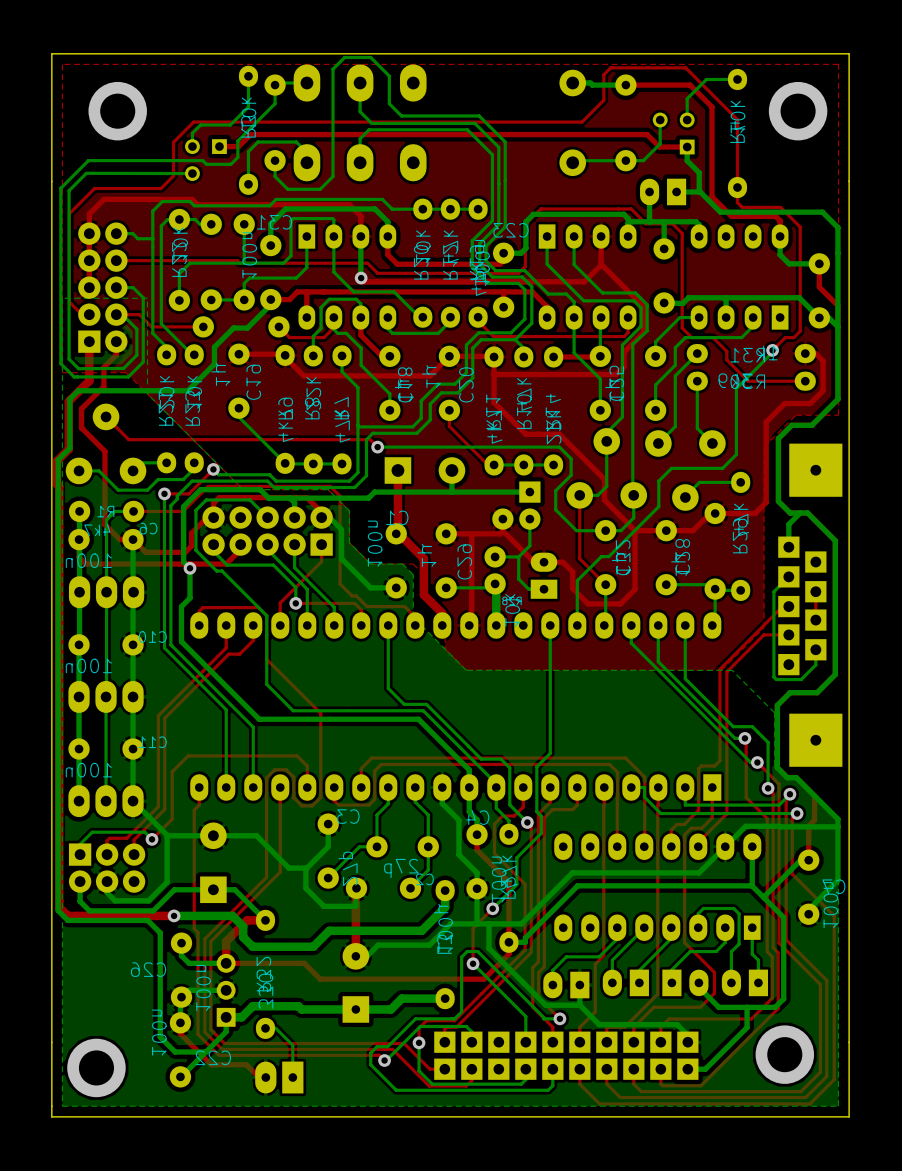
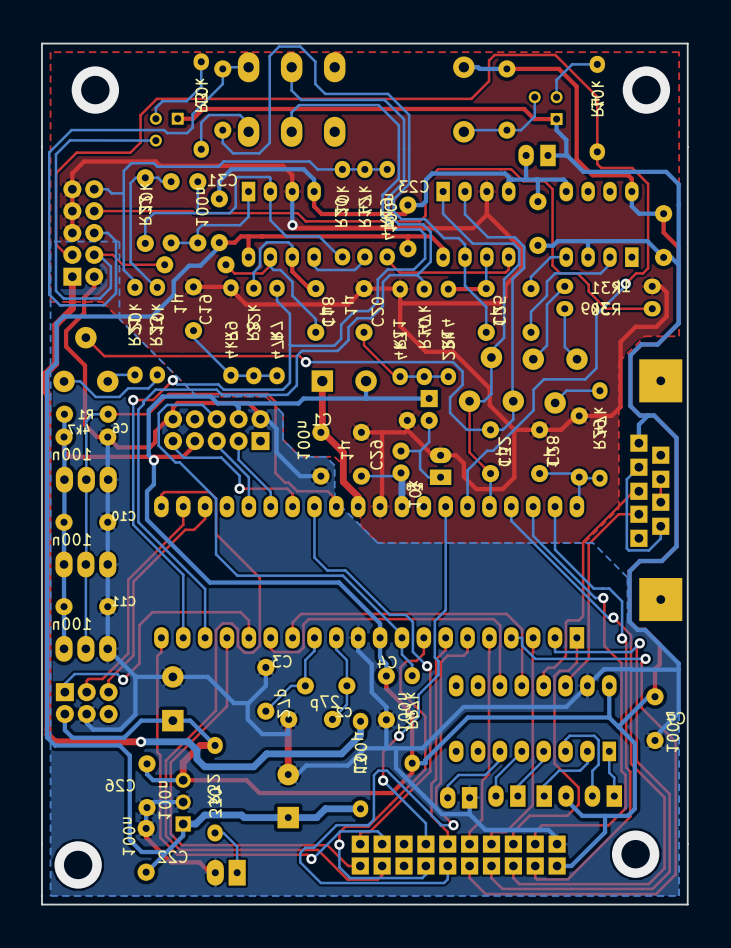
top track: (321, 544) (321, 561) (280, 602) (280, 625) -> none

